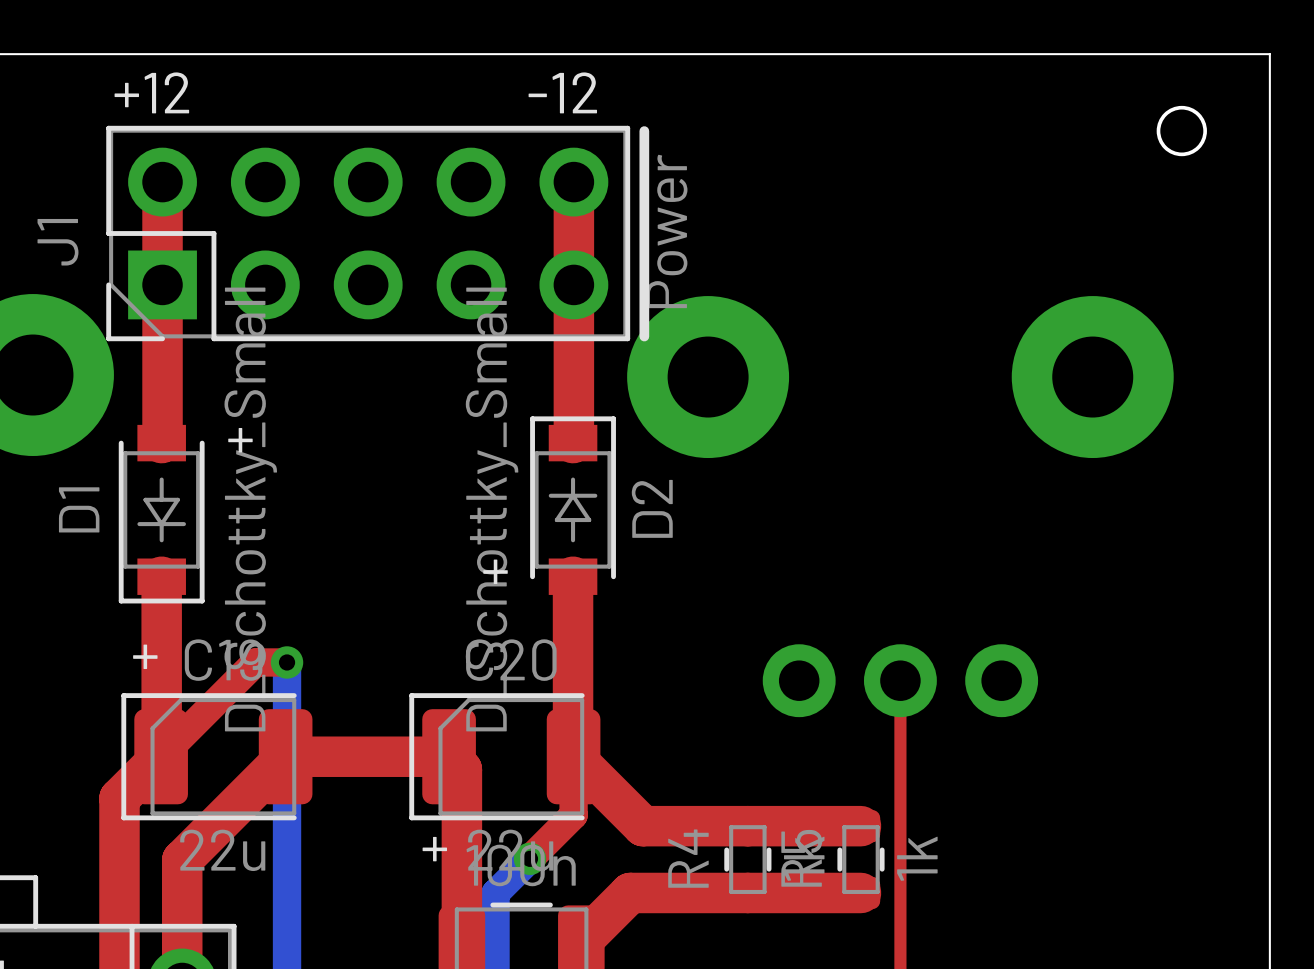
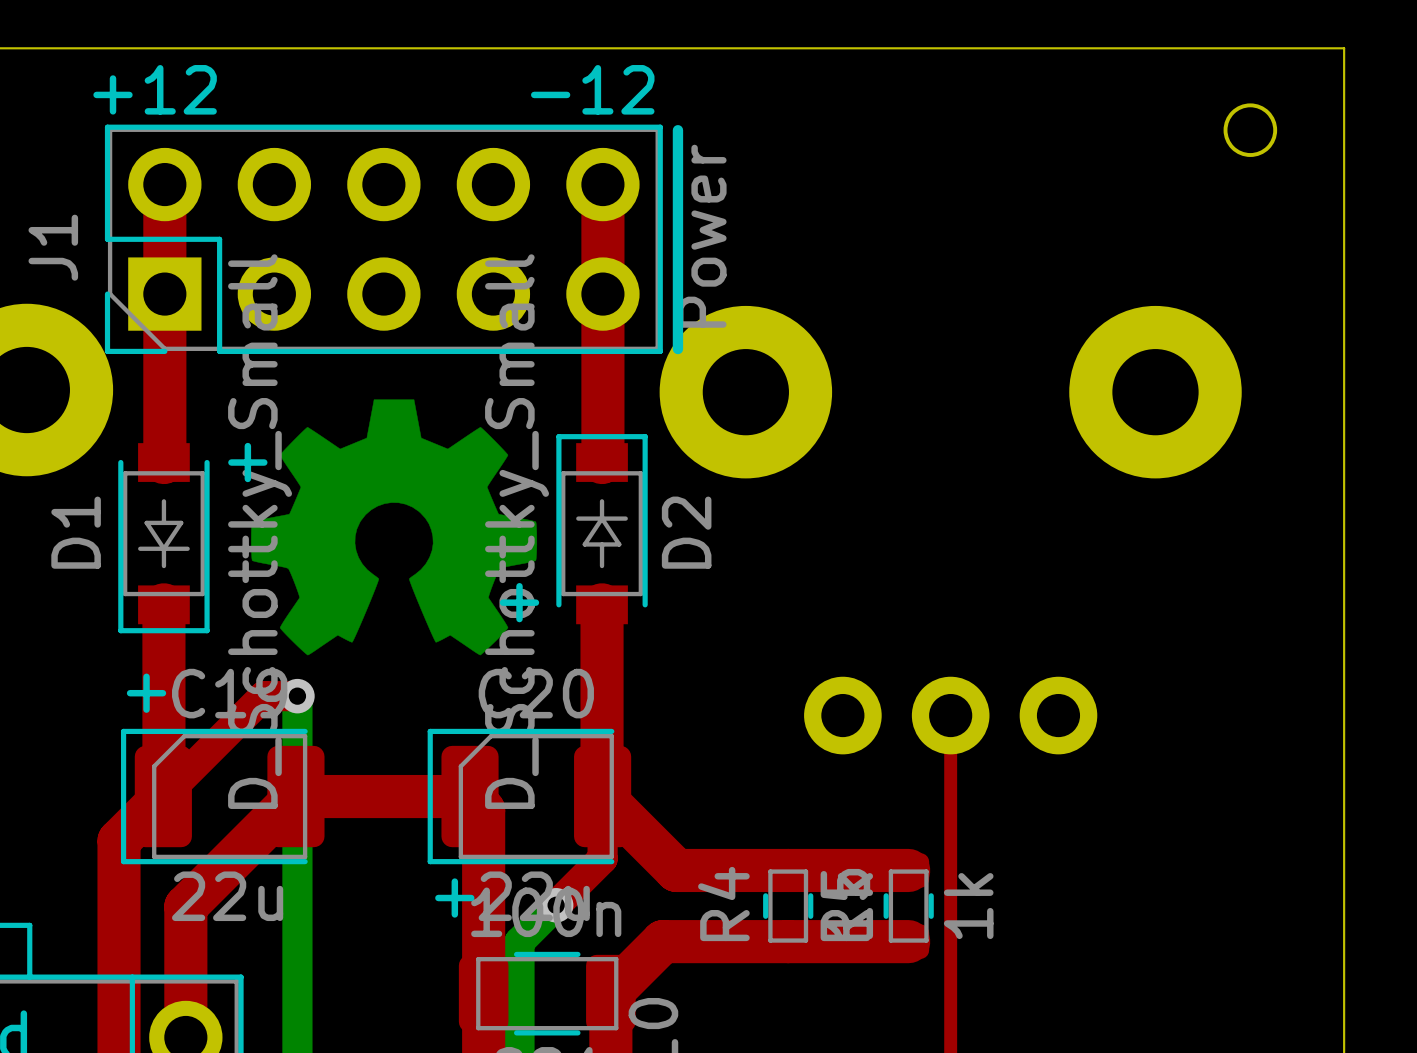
drawing: none -> [251, 399, 538, 656]

